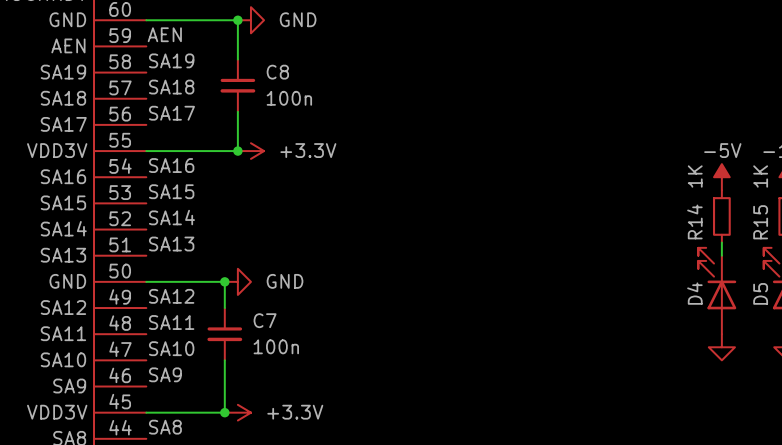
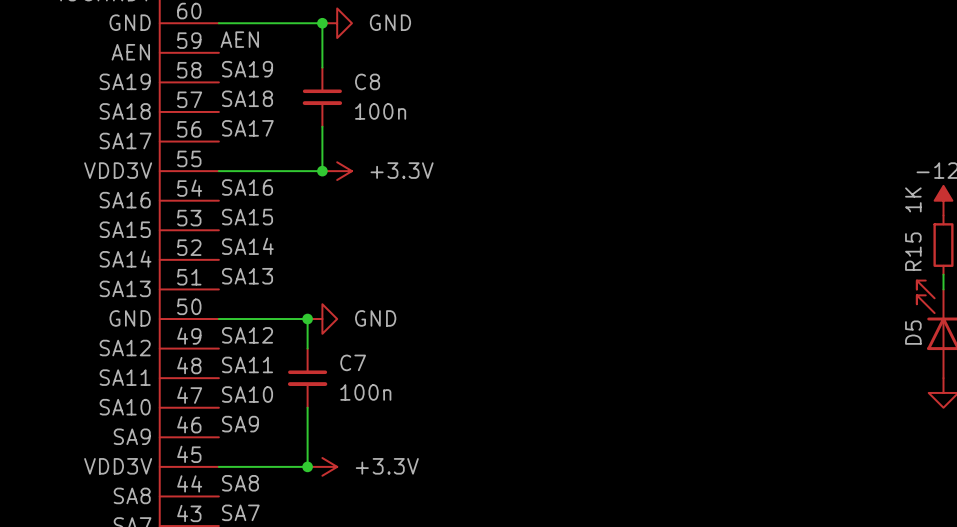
power symbol: -5V (721, 177) -> none
R14: 1K (721, 216) -> none
wire: (721, 242) (721, 255) -> none
D4: (717, 291) -> none
power symbol: (721, 347) -> none

